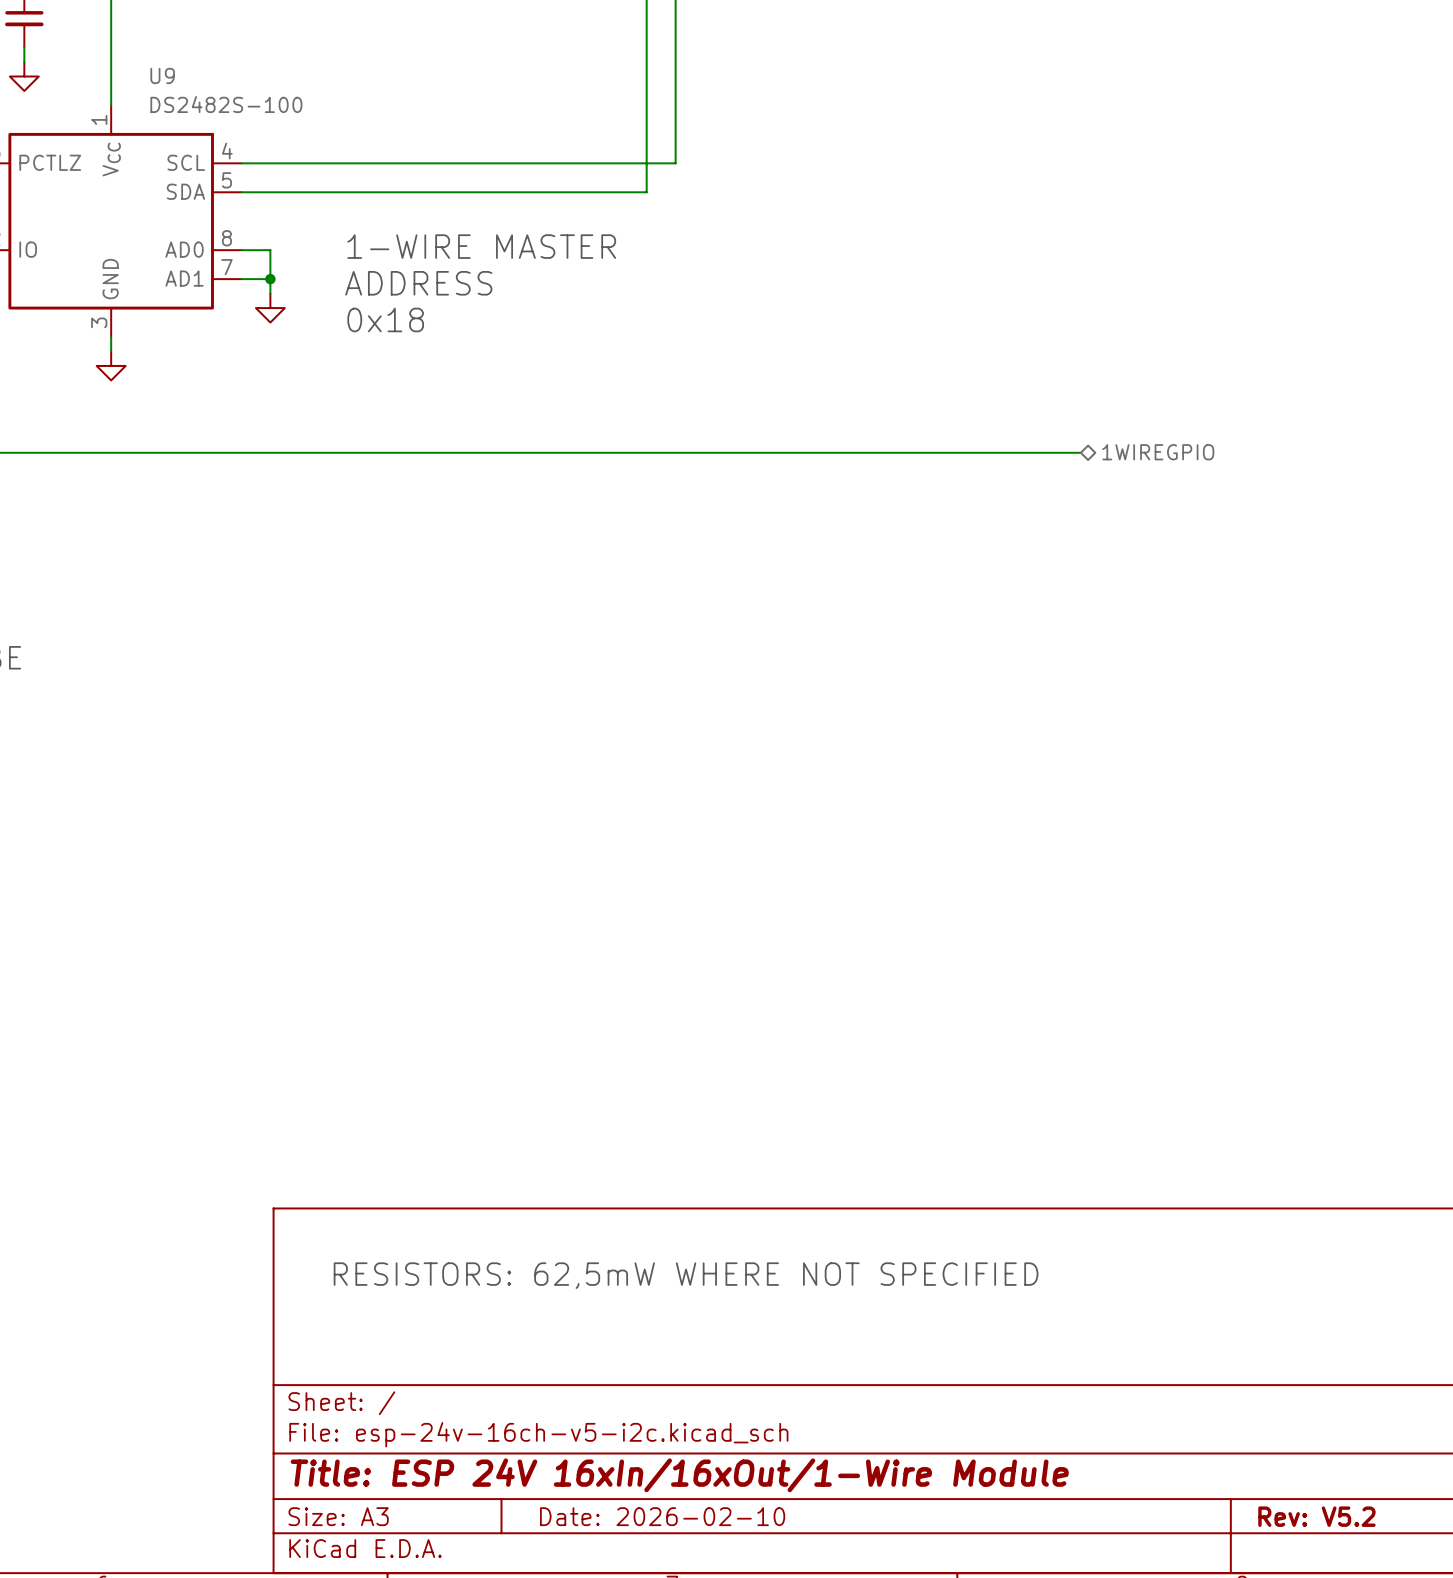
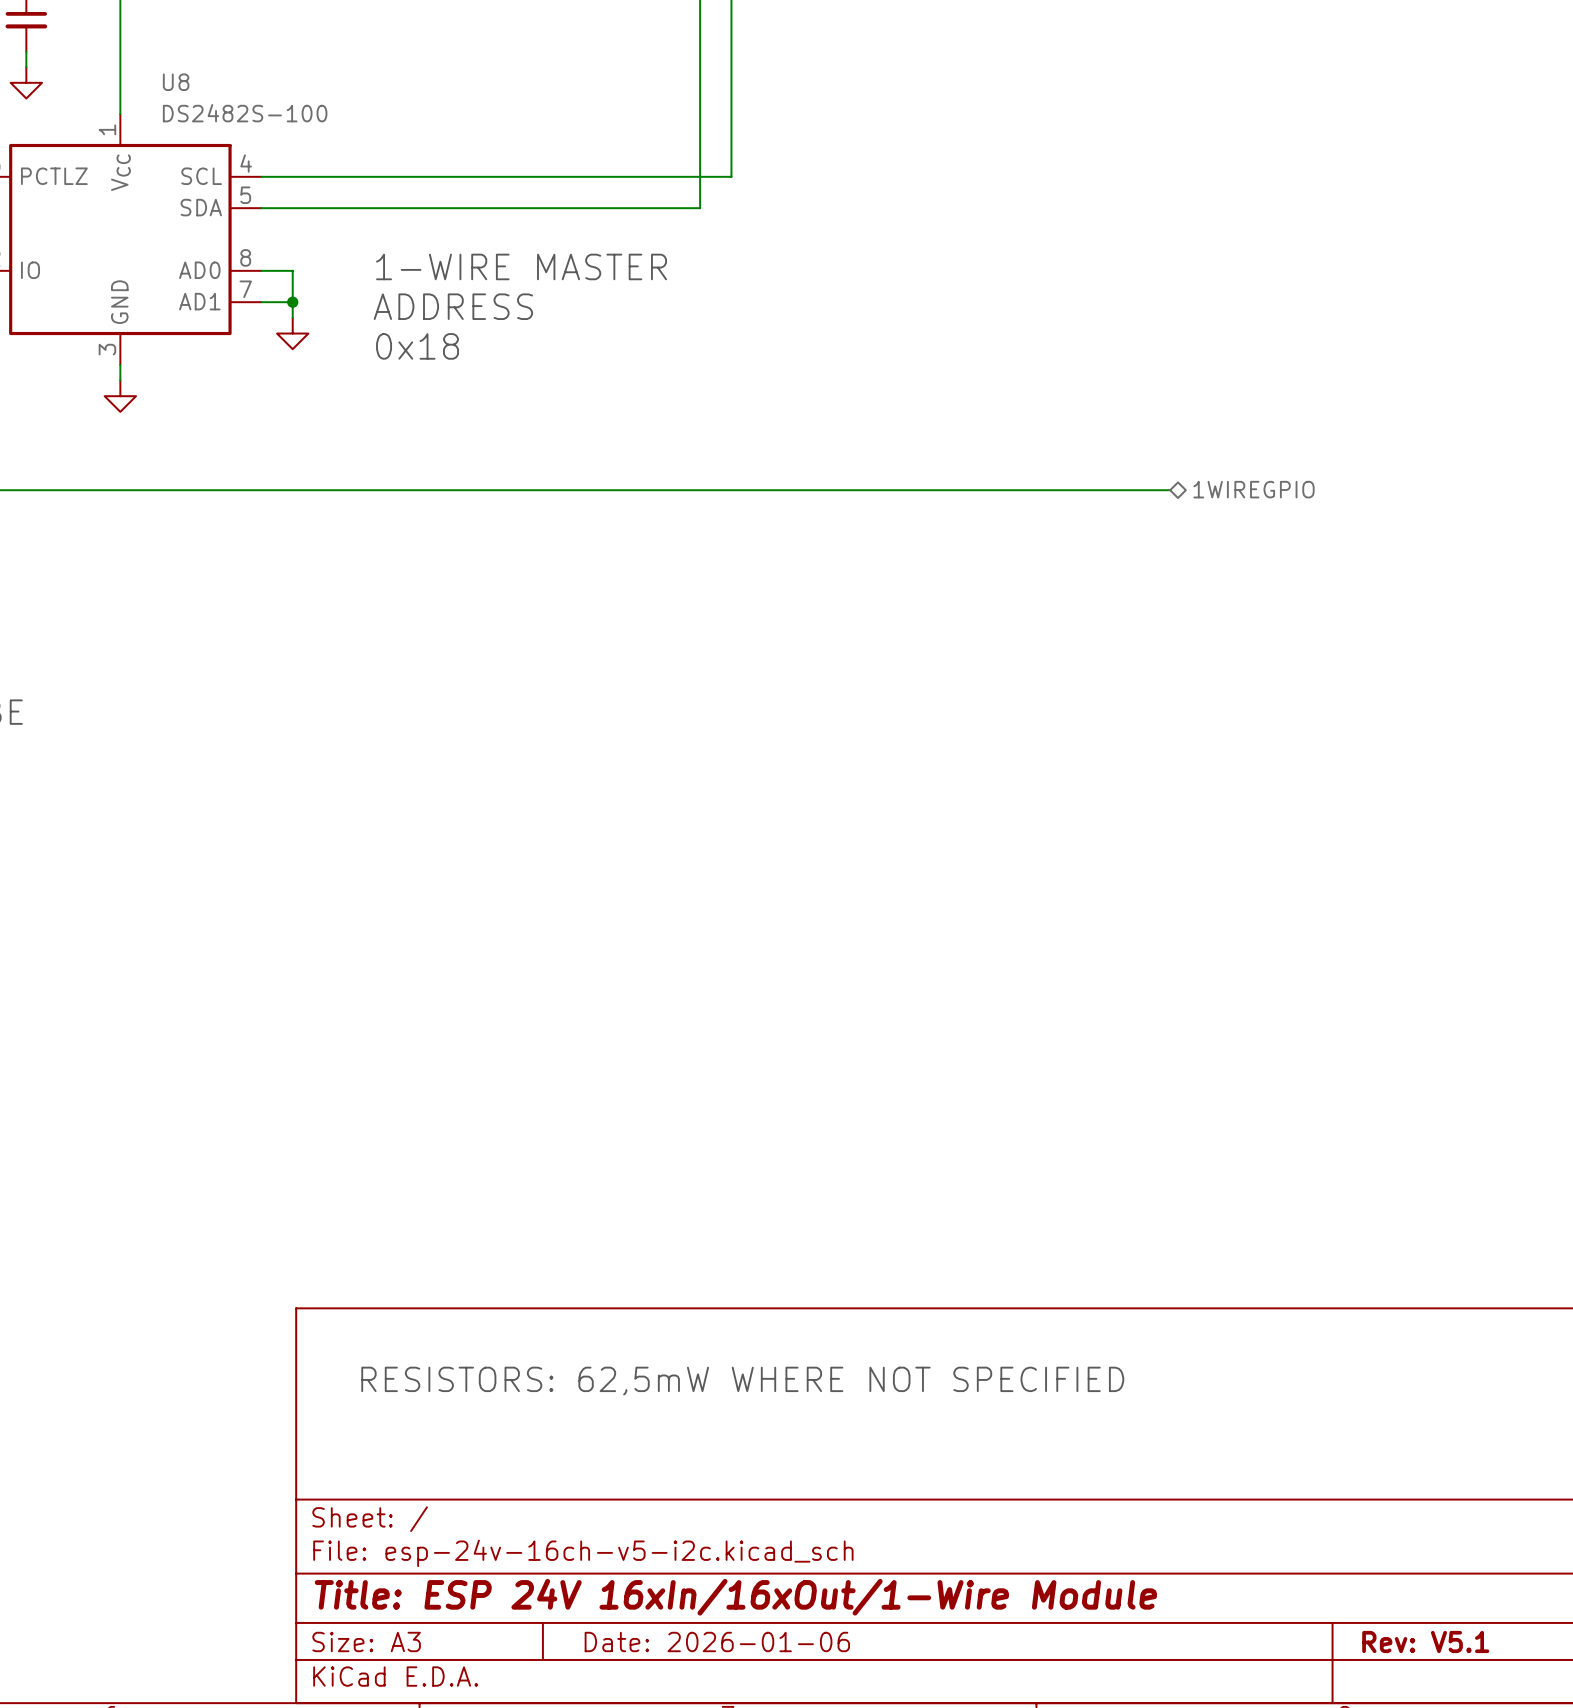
U9 name: U9 (162, 75) -> U8 (176, 82)
title block: Date: 2026-02-10 (662, 1516) -> Date: 2026-01-06 (717, 1641)
title block: Rev: V5.2 (1316, 1516) -> Rev: V5.1 (1425, 1641)

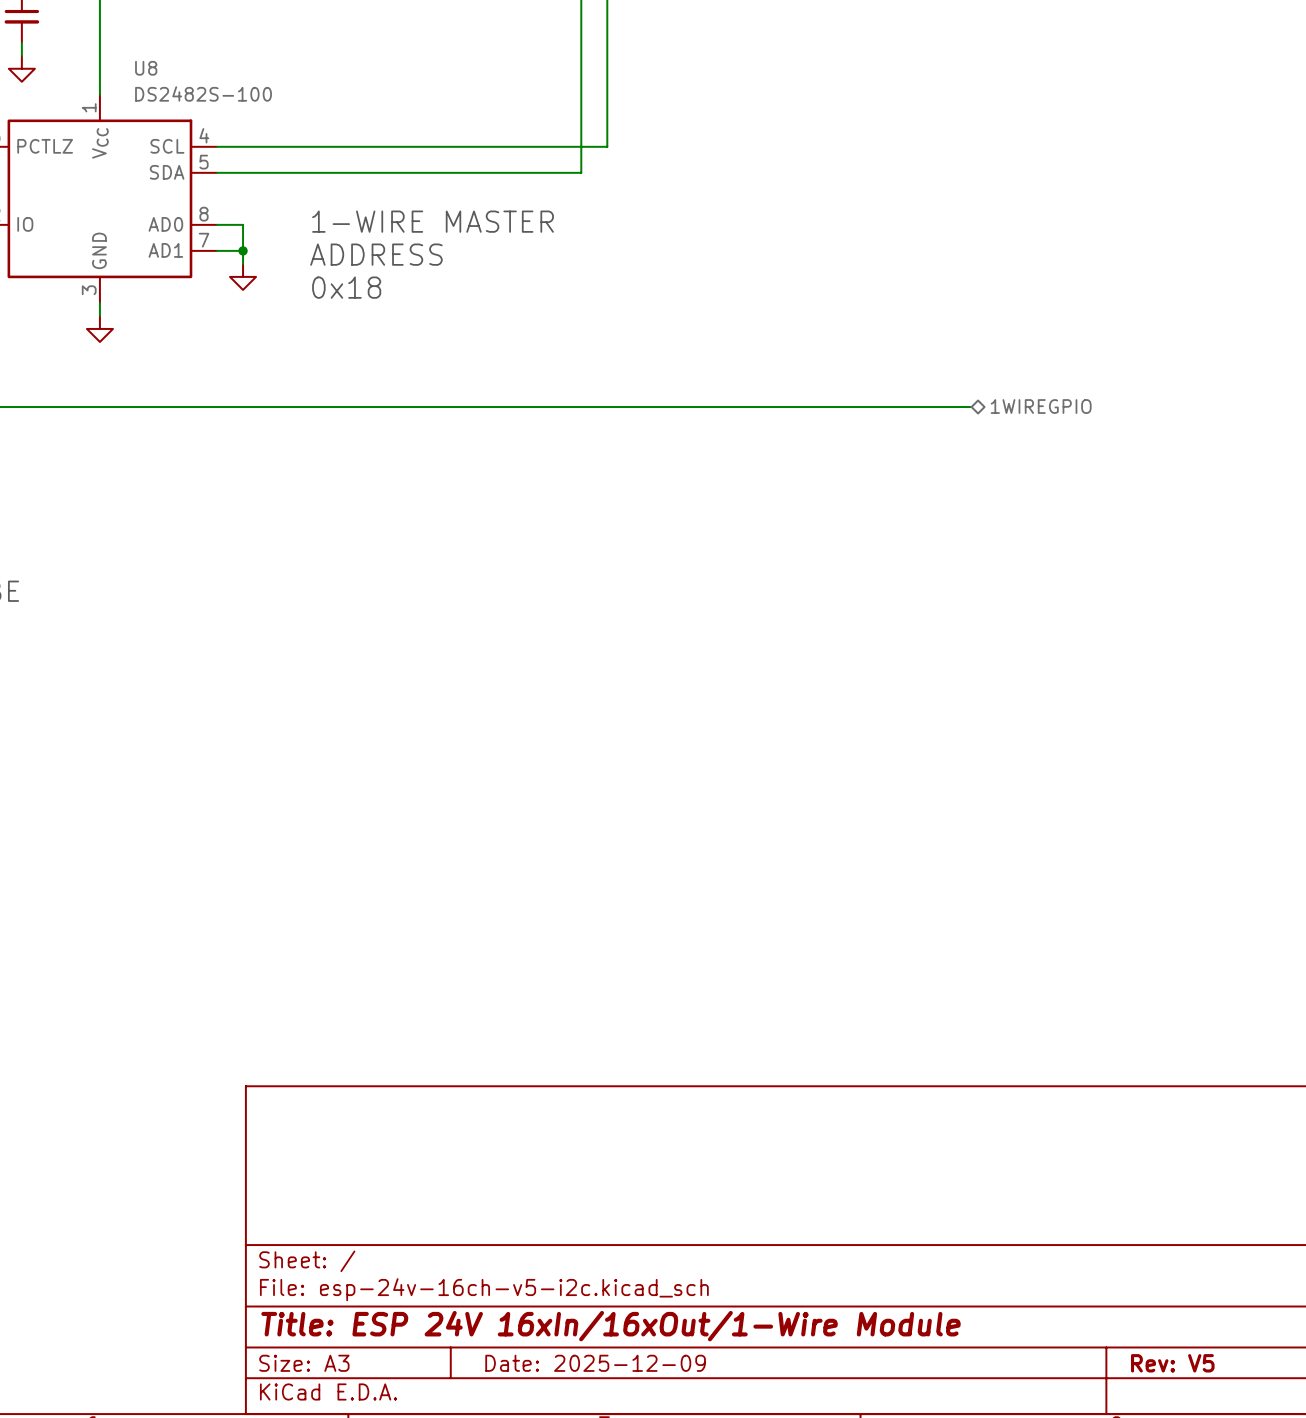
text: RESISTORS: 62,5mW WHERE NOT SPECIFIED (742, 1381) -> none
title block: Date: 2026-01-06 (717, 1641) -> Date: 2025-12-09 (595, 1363)
title block: Rev: V5.1 (1425, 1641) -> Rev: V5 (1172, 1363)

